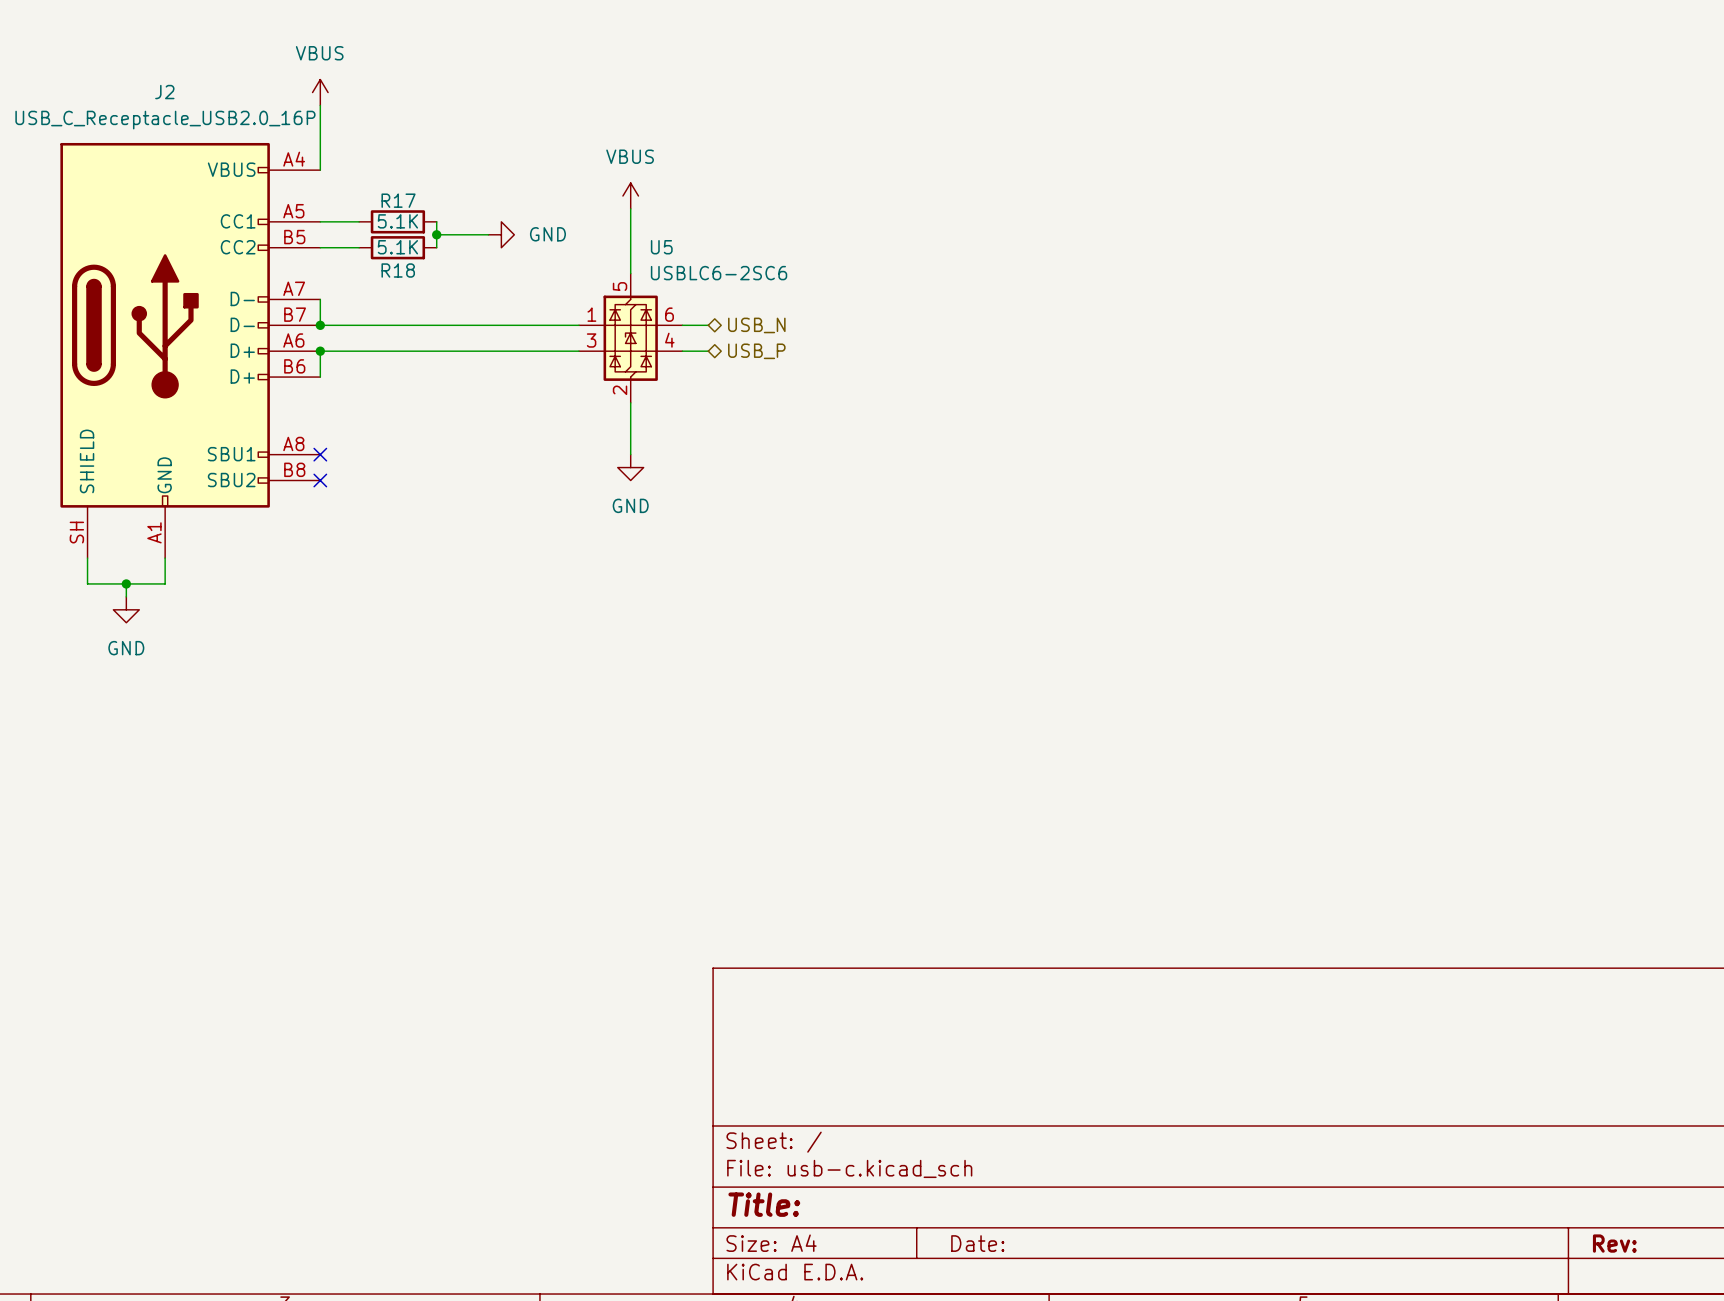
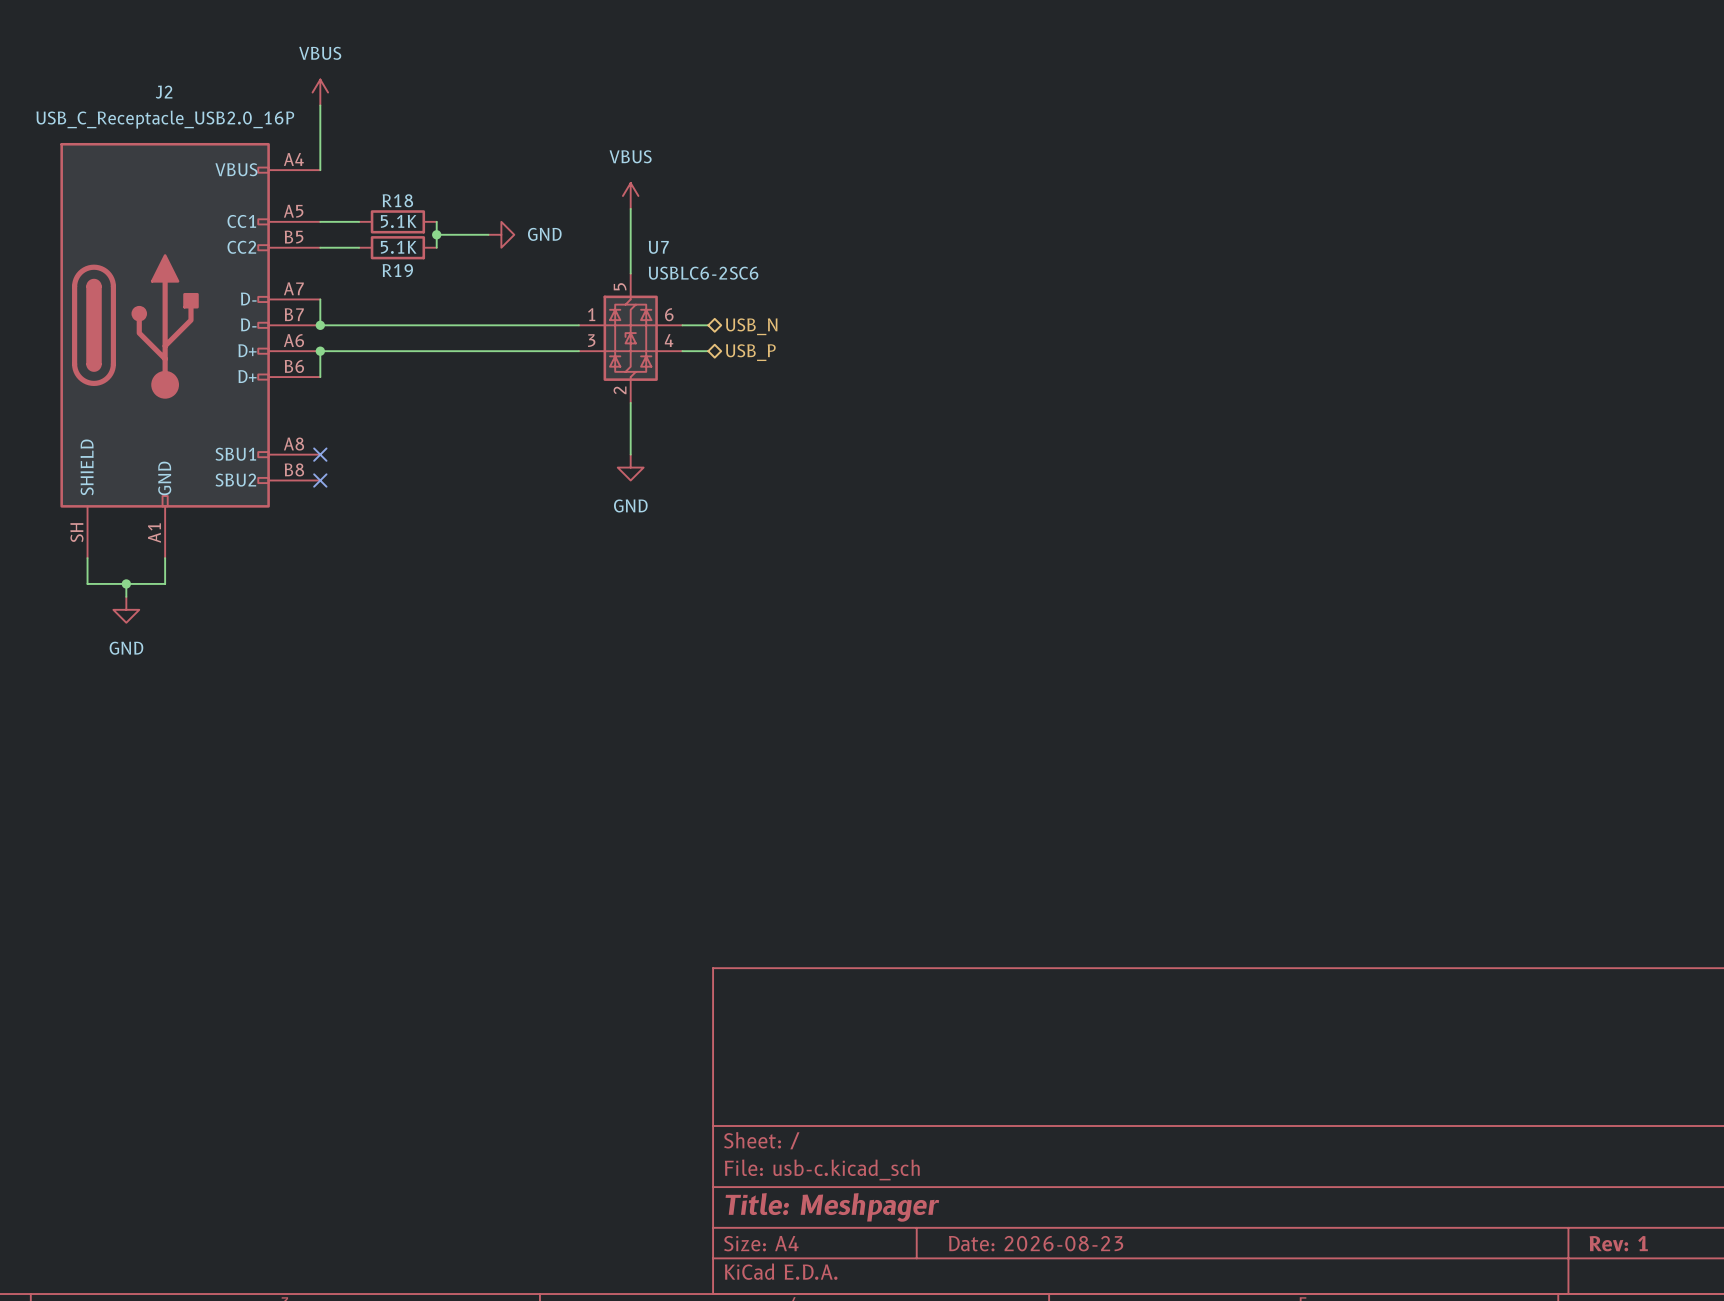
R17 name: R17 (398, 200) -> R18 (397, 200)
U5 name: U5 (661, 247) -> U7 (658, 247)
R18 name: R18 (398, 270) -> R19 (397, 270)
title block: Title: (764, 1204) -> Title: Meshpager (832, 1207)
title block: Date: (977, 1243) -> Date: 2026-08-23 (1036, 1243)
title block: Rev: (1614, 1243) -> Rev: 1 (1618, 1243)

